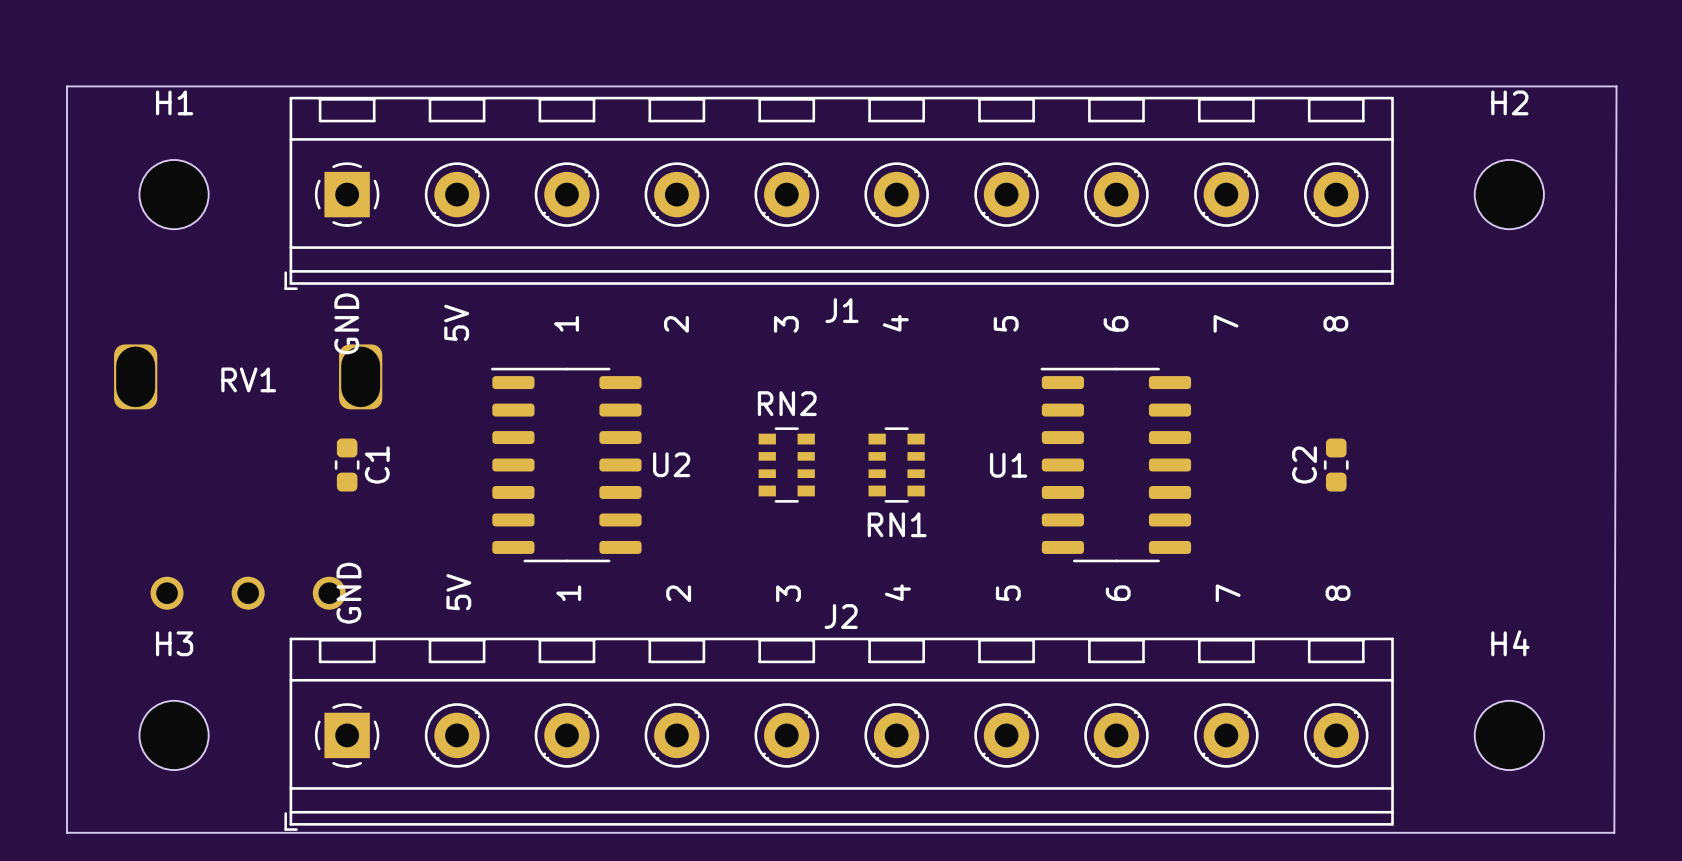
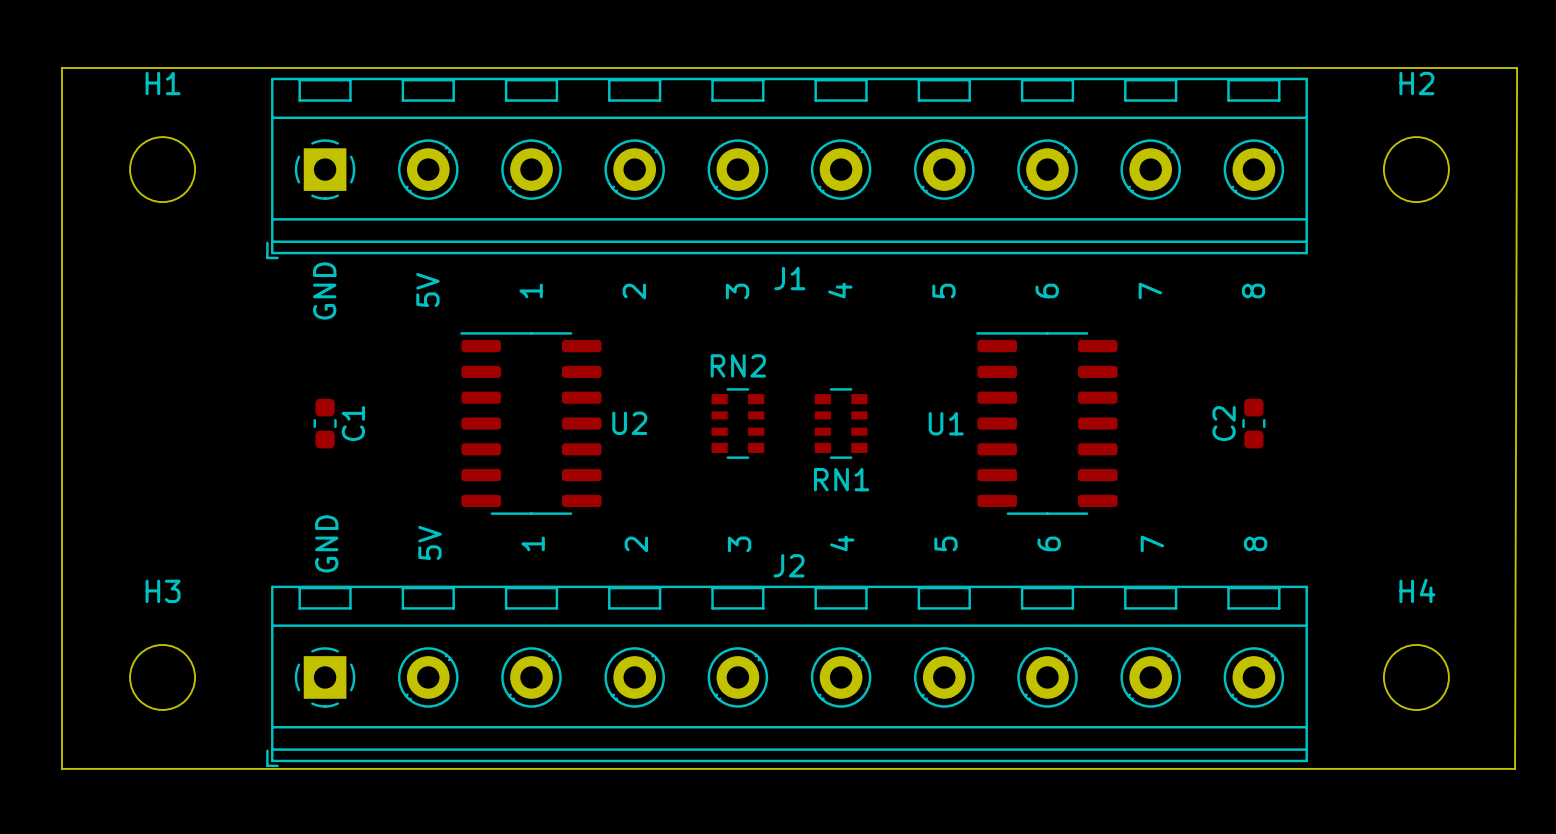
RV1: (248, 477) -> none

